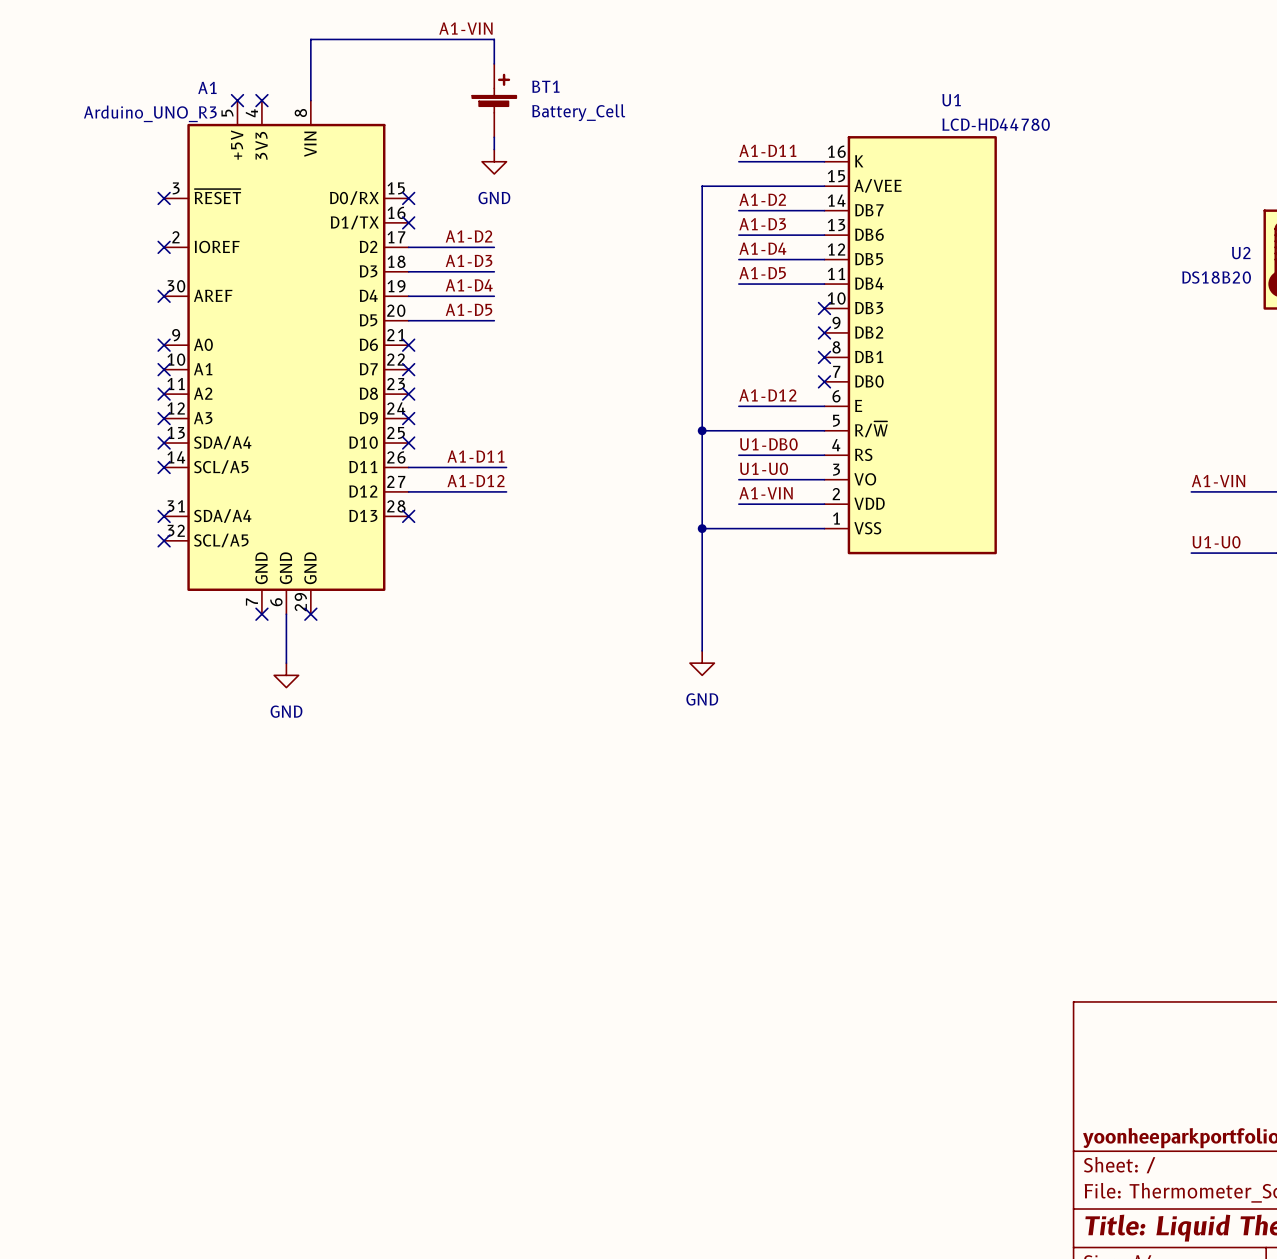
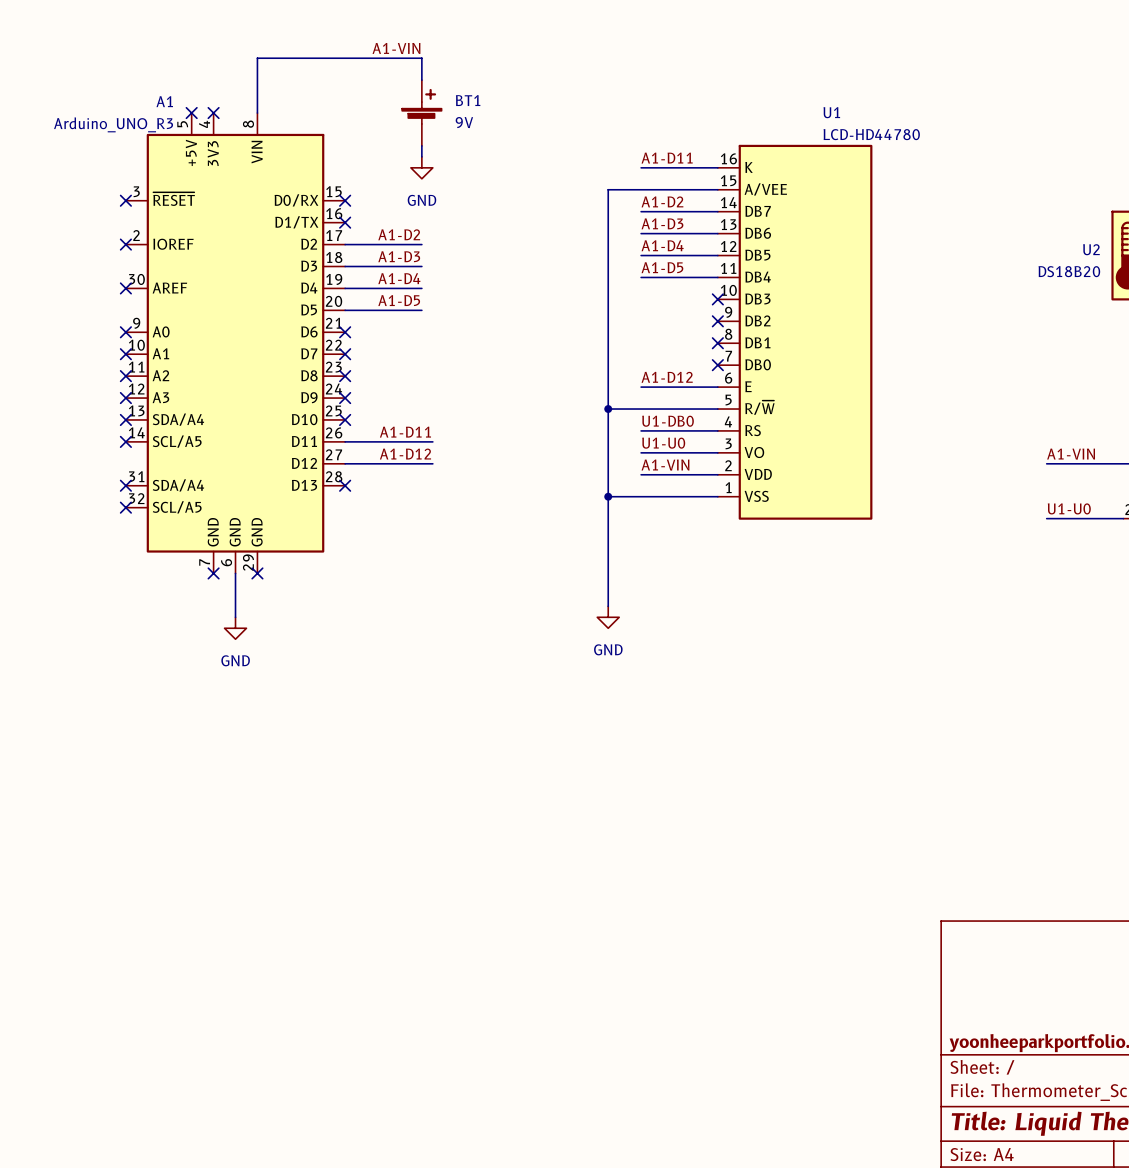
BT1 value: Battery_Cell (578, 112) -> 9V (464, 122)

